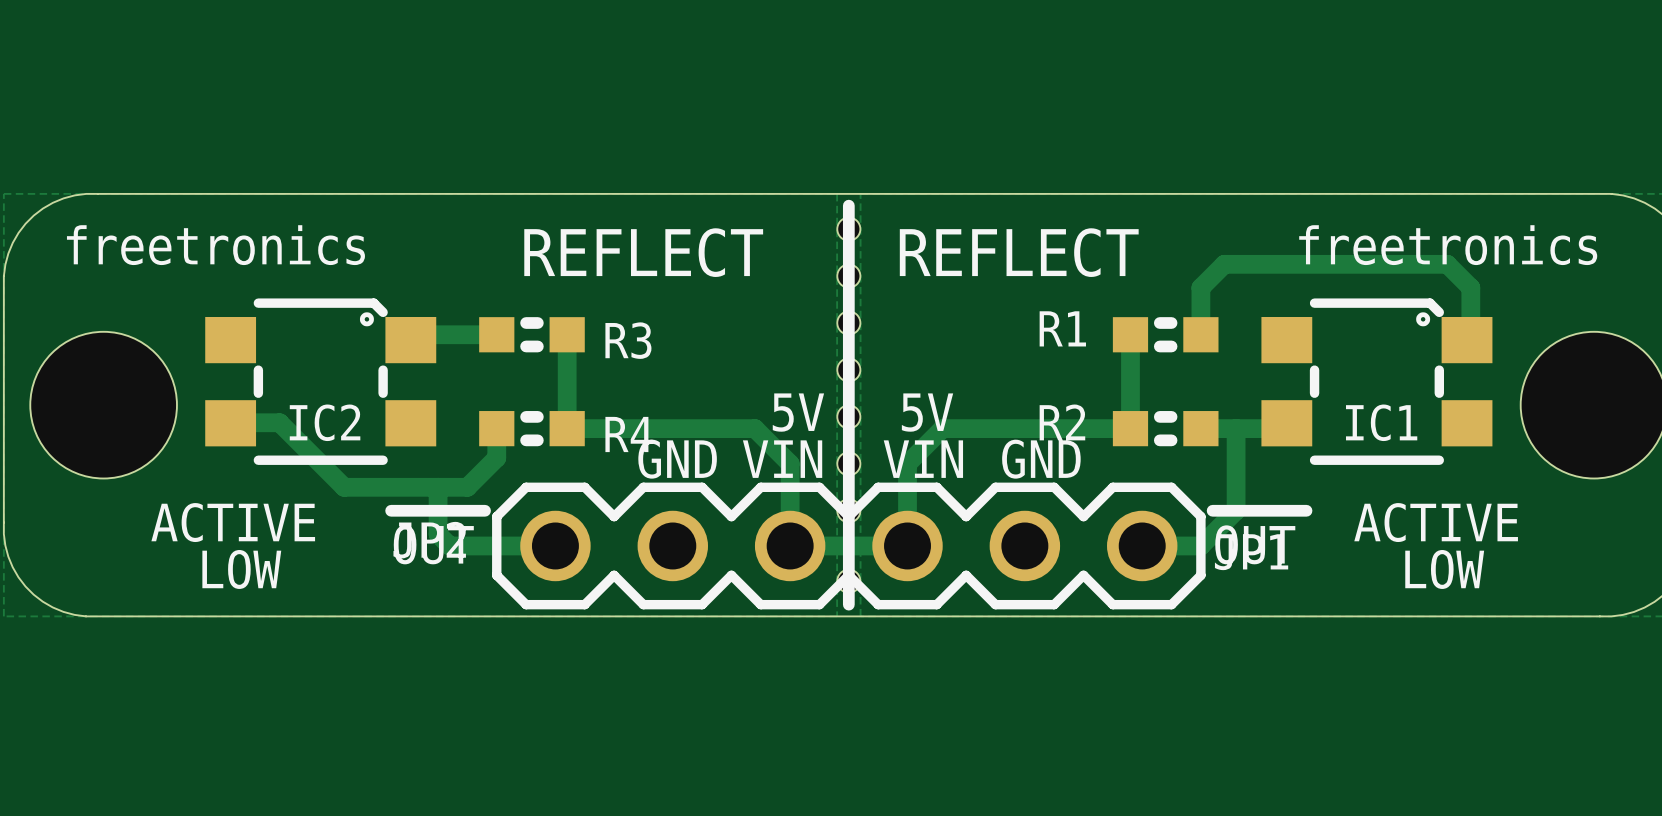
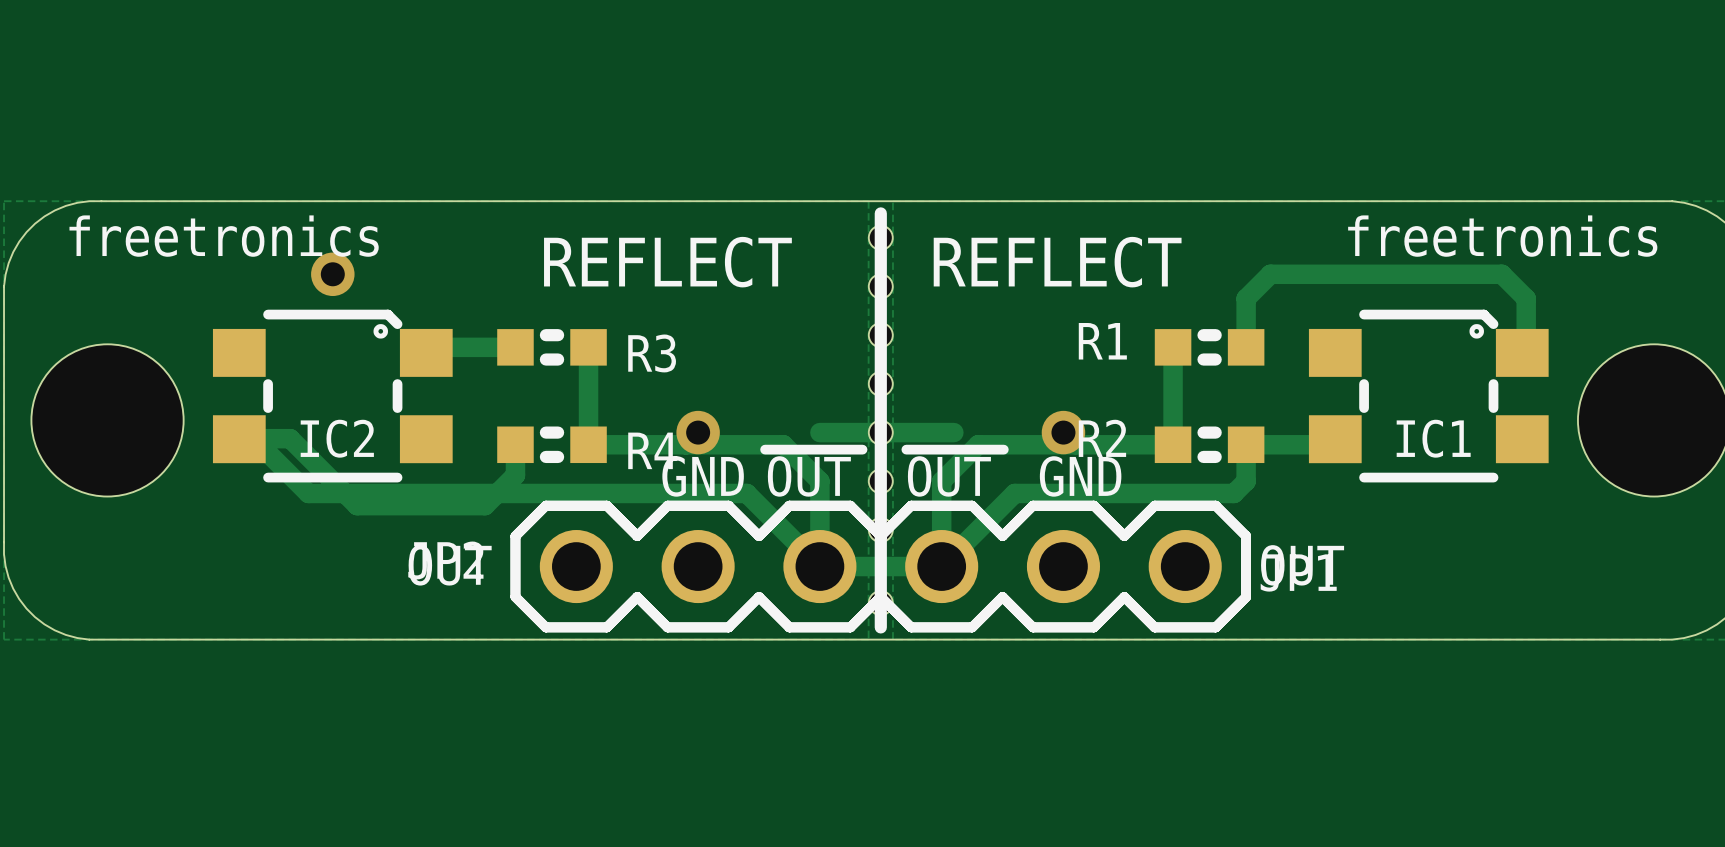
text position: freetronics (215, 245) -> freetronics (224, 236)
text position: freetronics (1448, 245) -> freetronics (1502, 236)
via: none -> (332, 274)
text: 5V (798, 412) -> none
text: 5V (927, 412) -> none
via: none -> (698, 432)
track: none -> (819, 432) (953, 432)
via: none -> (1063, 432)
track: none -> (239, 439) (242, 439) (247, 444) (259, 444) (308, 493) (746, 493) (819, 566)
track: none -> (1246, 444) (1246, 481) (1233, 493) (1014, 493) (941, 566)
track: (1236, 428) (1236, 510) (1200, 545) (1142, 545) -> none
text: none -> OUT (809, 476)
text: VIN (782, 459) -> none
text: none -> OUT (949, 476)
text: VIN (923, 459) -> none
track: (438, 487) (438, 534) (449, 545) (555, 545) -> none
line: none -> (545, 505) (606, 505) (637, 536) (667, 505) (728, 505) (759, 536) (789, 505) (850, 505) (880, 536) (911, 505) (972, 505) (1002, 536) (1033, 505) (1093, 505) (1124, 536) (1154, 505) (1215, 505) (1246, 536) (1246, 596) (1215, 627) (1154, 627) (1124, 596) (1093, 627) (1033, 627) (1002, 596) (972, 627) (911, 627) (880, 596) (850, 627) (789, 627) (759, 596) (728, 627) (667, 627) (637, 596) (606, 627) (545, 627) (515, 596) (515, 536) (545, 505)
line: (391, 510) (485, 510) -> (765, 449) (862, 449)
line: (1212, 510) (1306, 510) -> (906, 449) (1003, 449)
text: ACTIVE (233, 522) -> none
text: ACTIVE (1436, 522) -> none
text: LOW (241, 569) -> none
text: LOW (1444, 569) -> none

